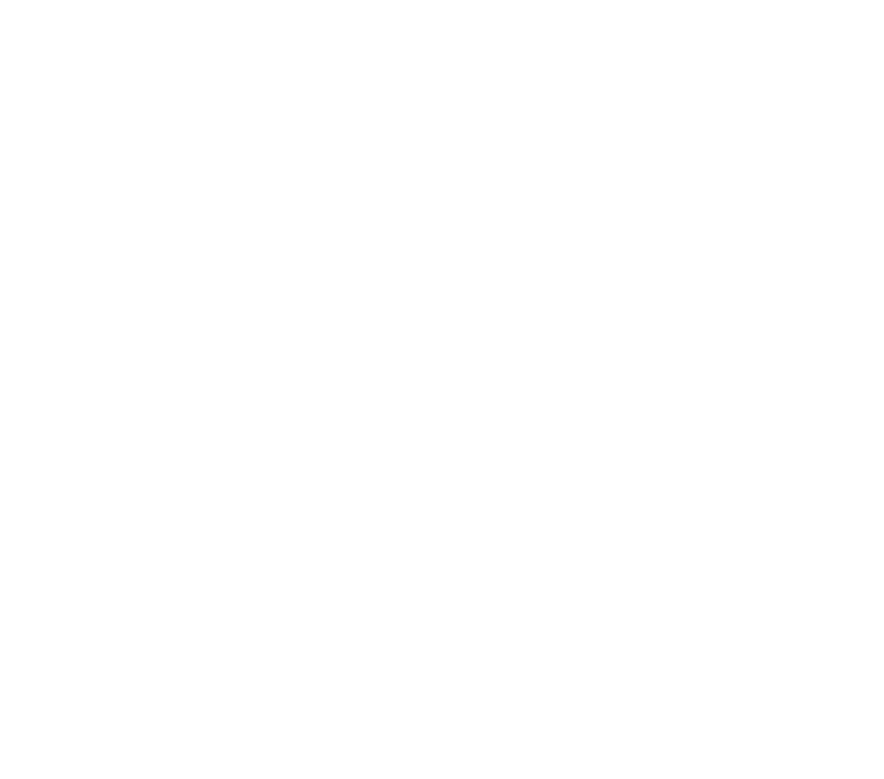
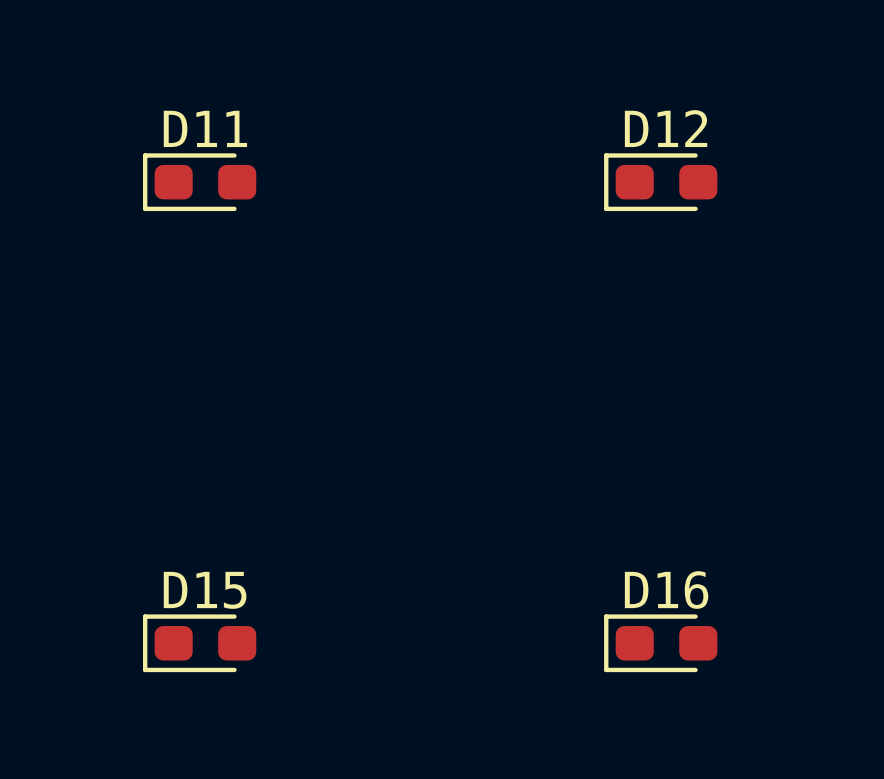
D11: none -> (199, 182)
D12: none -> (660, 182)
D15: none -> (199, 643)
D16: none -> (660, 643)

